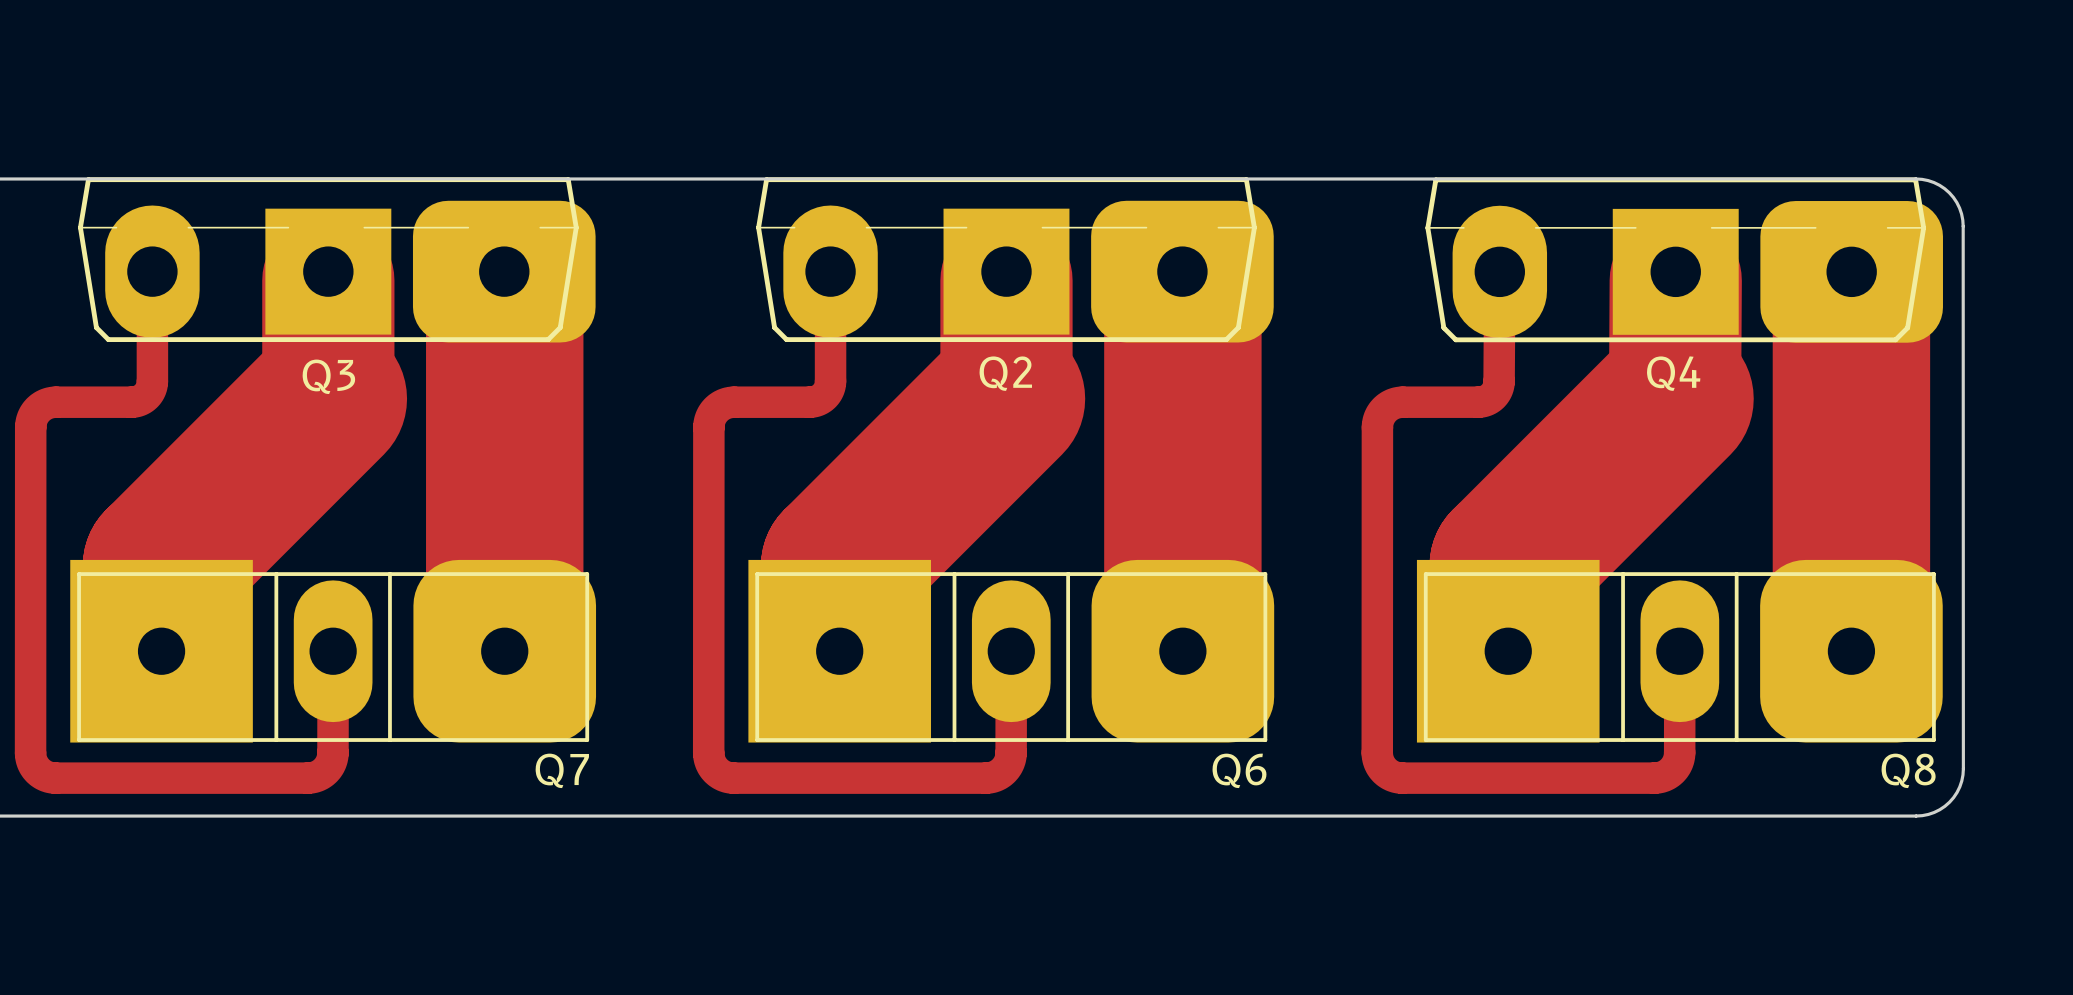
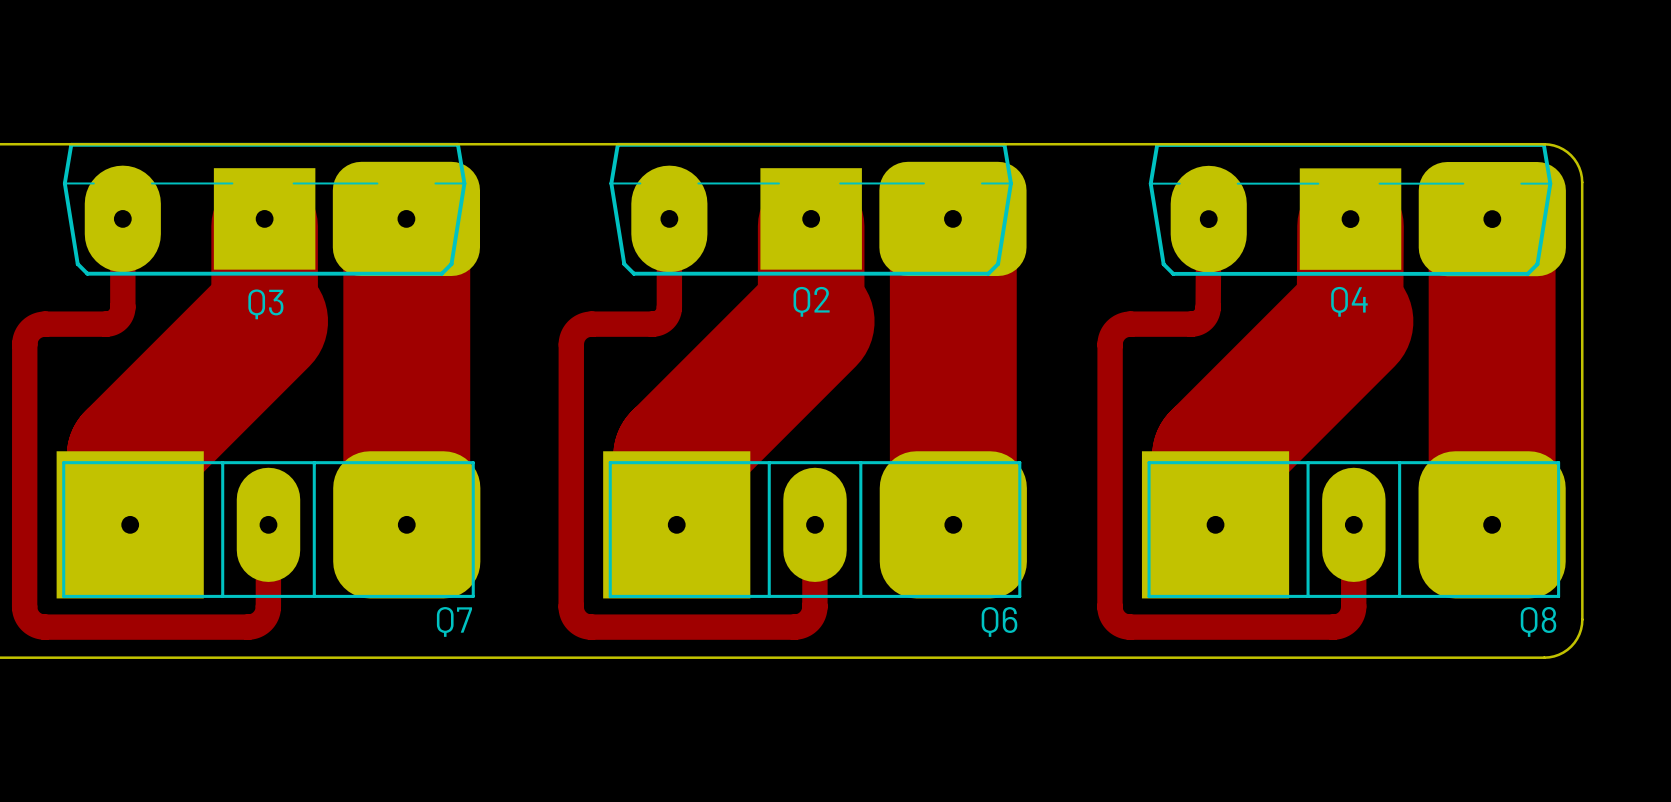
Q3 footprint: [78, 177, 596, 343] -> [62, 142, 481, 277]
Q2 footprint: [756, 177, 1274, 343] -> [609, 142, 1027, 277]
Q4 footprint: [1425, 177, 1943, 343] -> [1148, 143, 1566, 277]
Q7 footprint: [70, 559, 597, 743] -> [56, 451, 481, 599]
Q6 footprint: [748, 559, 1275, 743] -> [603, 451, 1027, 599]
Q8 footprint: [1416, 559, 1943, 743] -> [1141, 451, 1566, 599]

